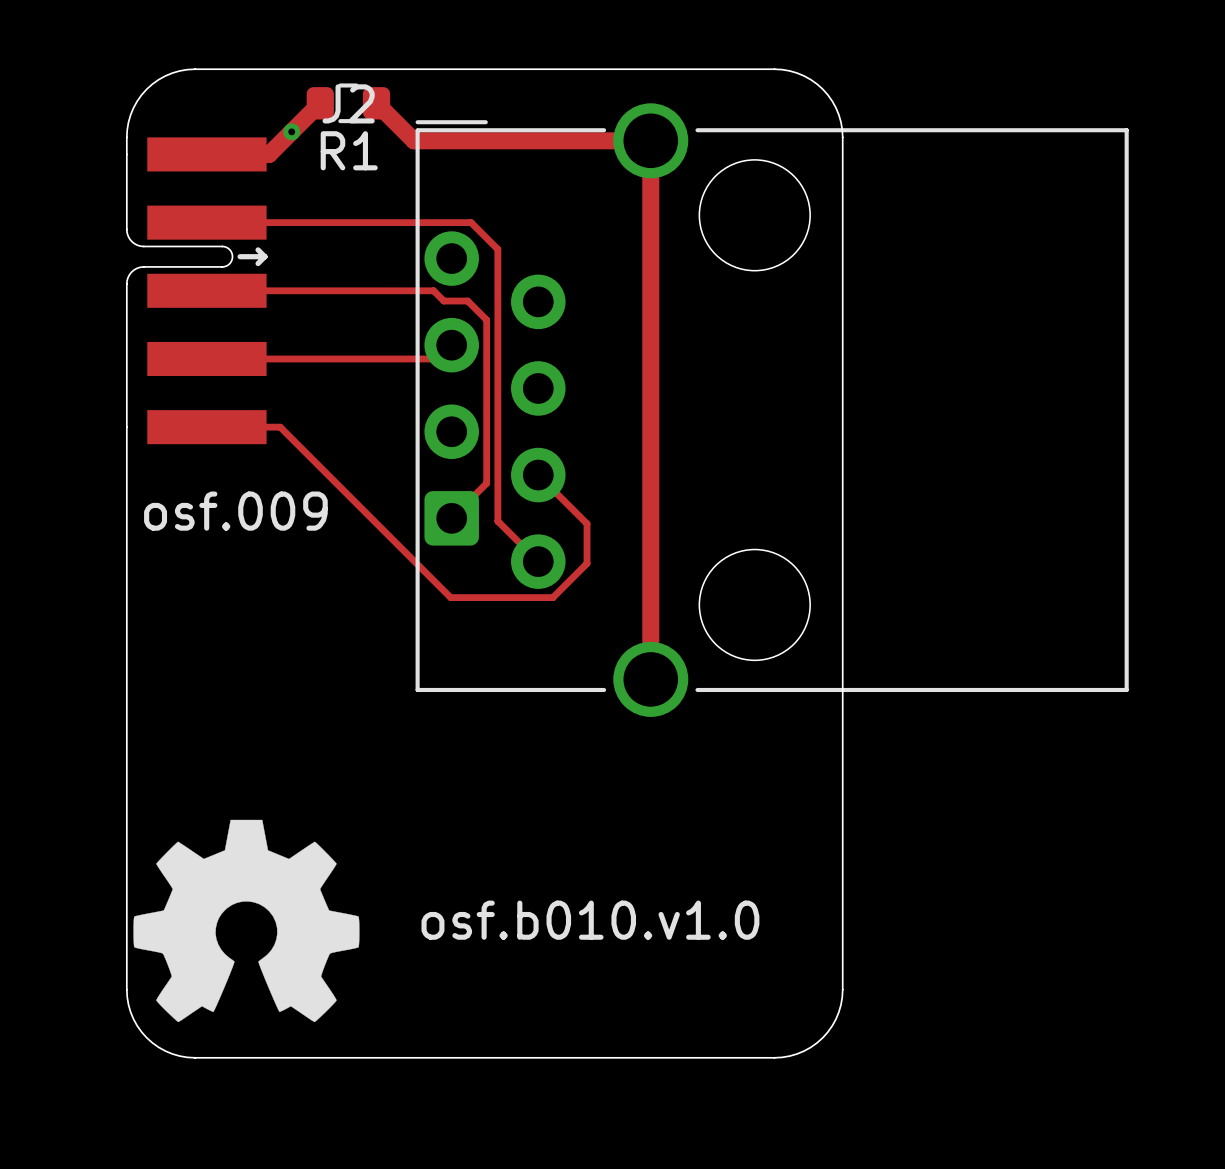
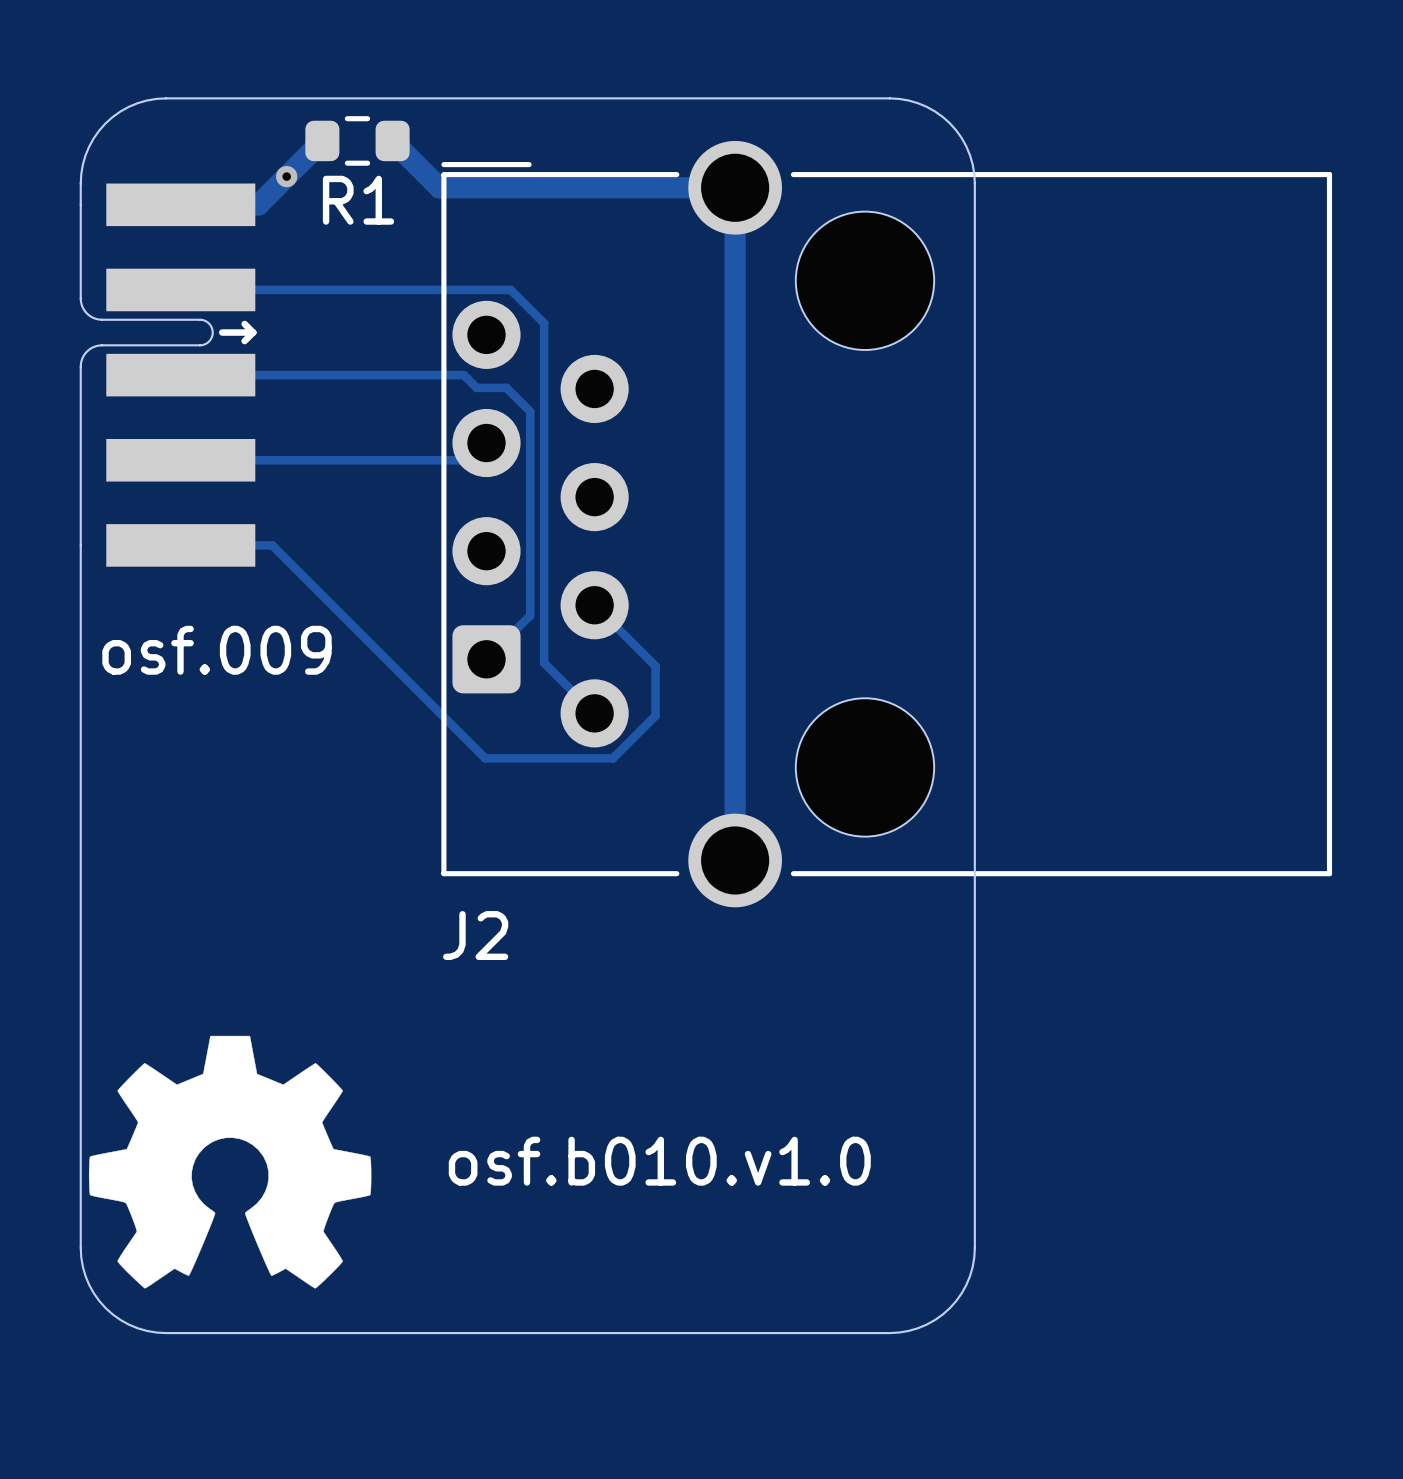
J2 name position: J2 (348, 103) -> J2 (475, 935)

